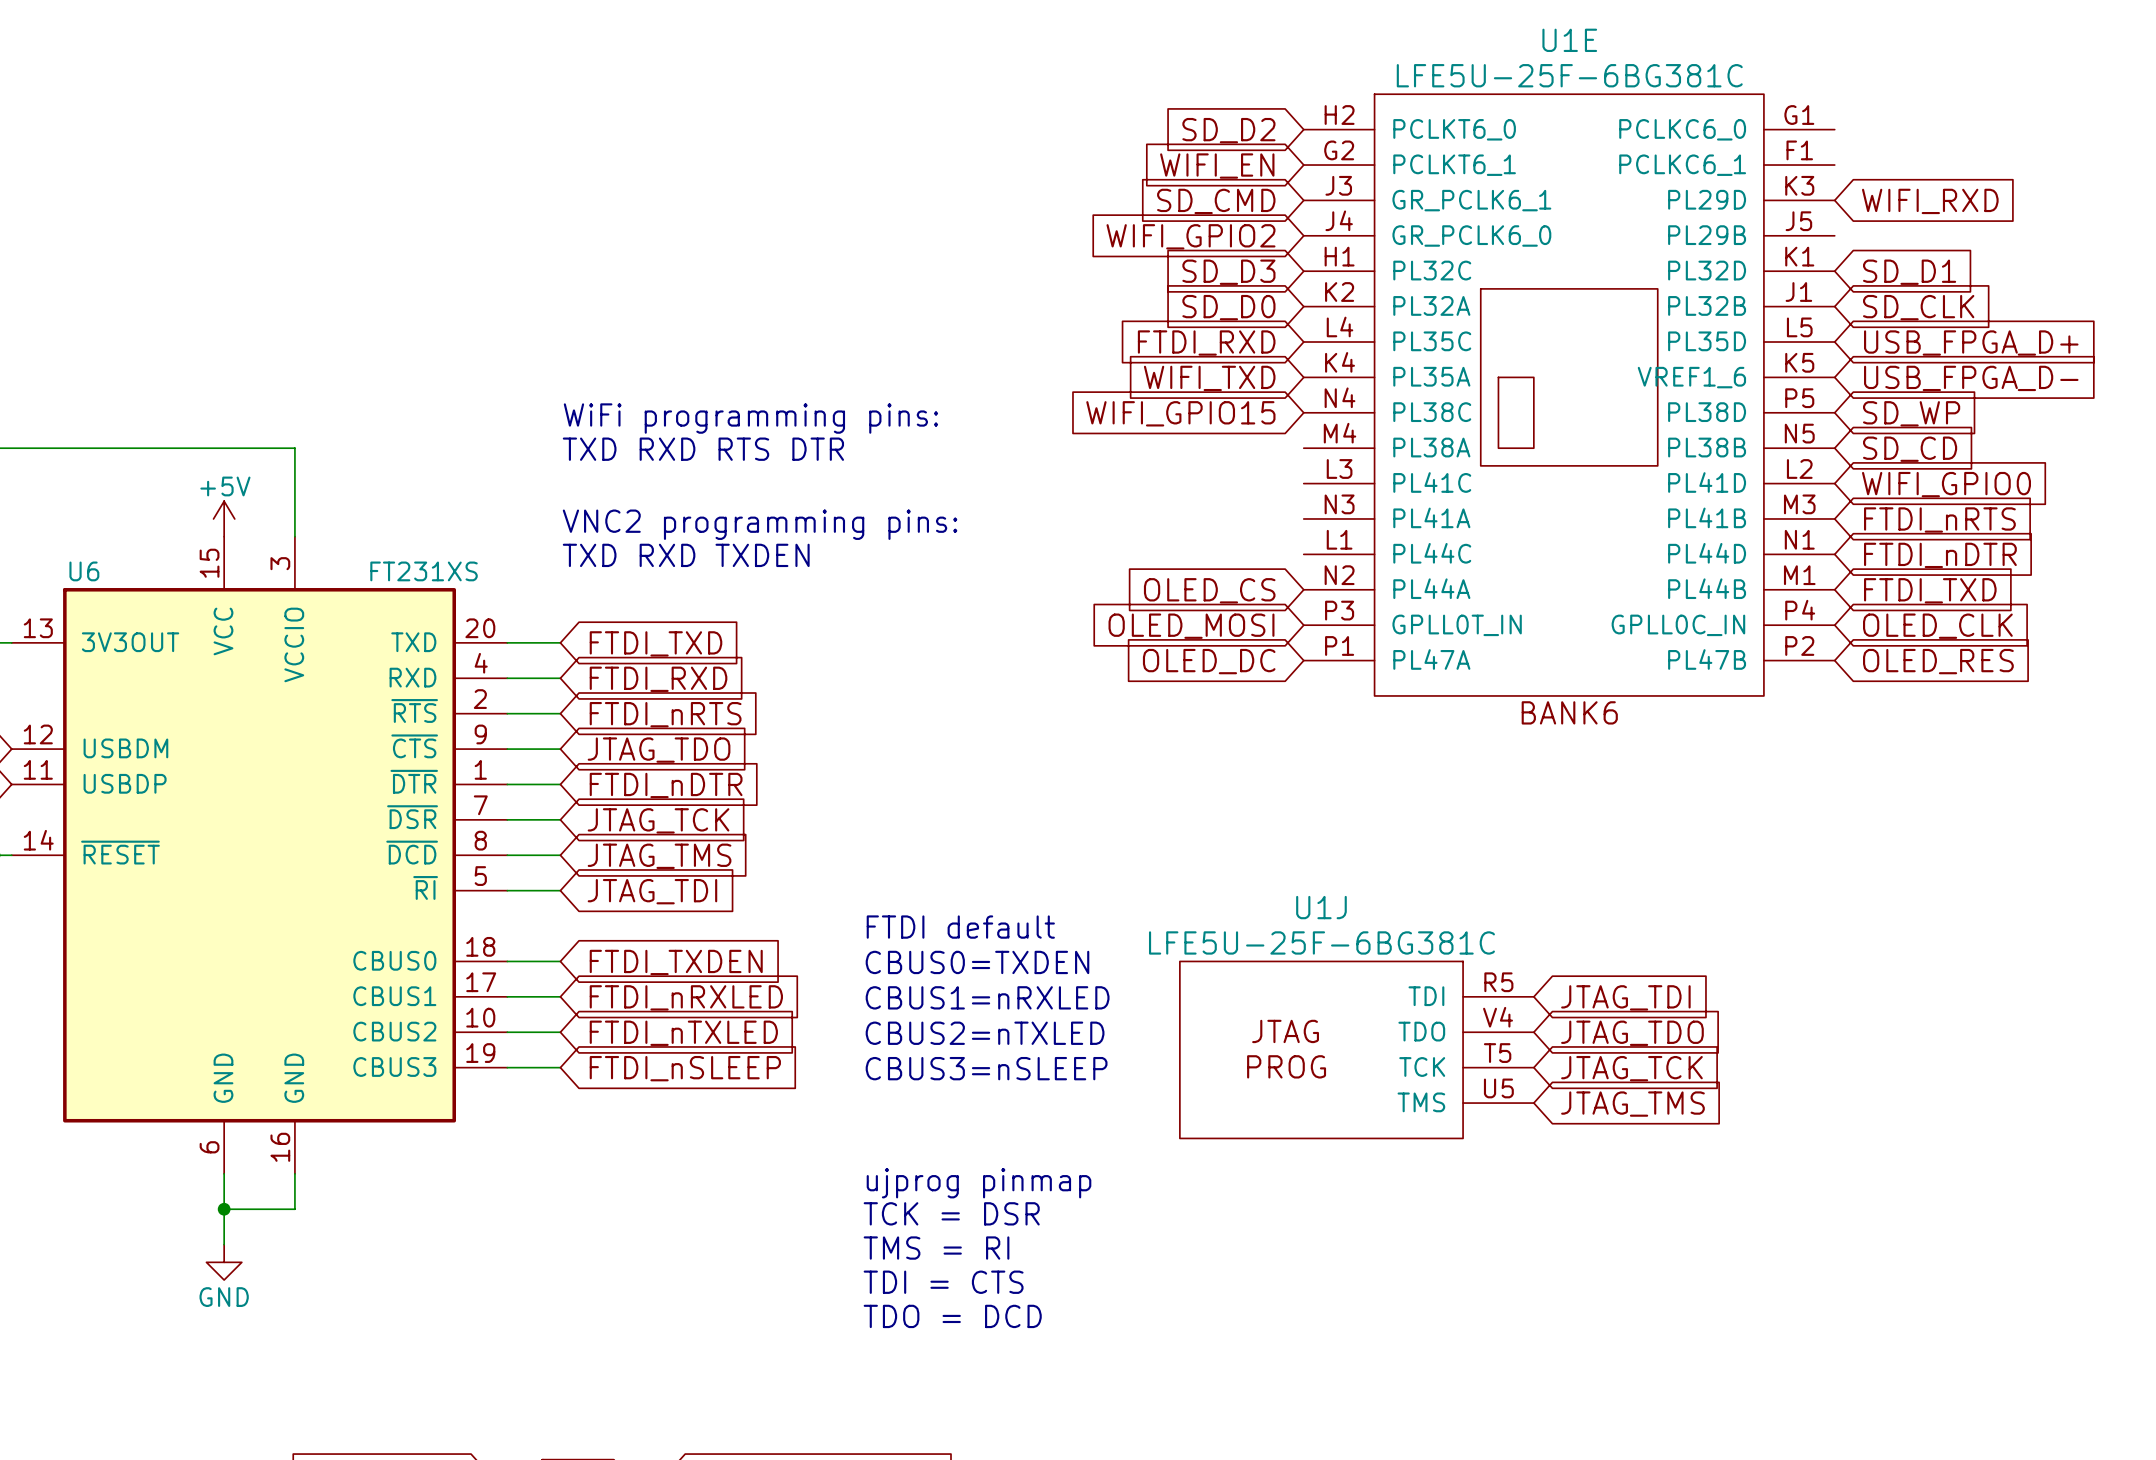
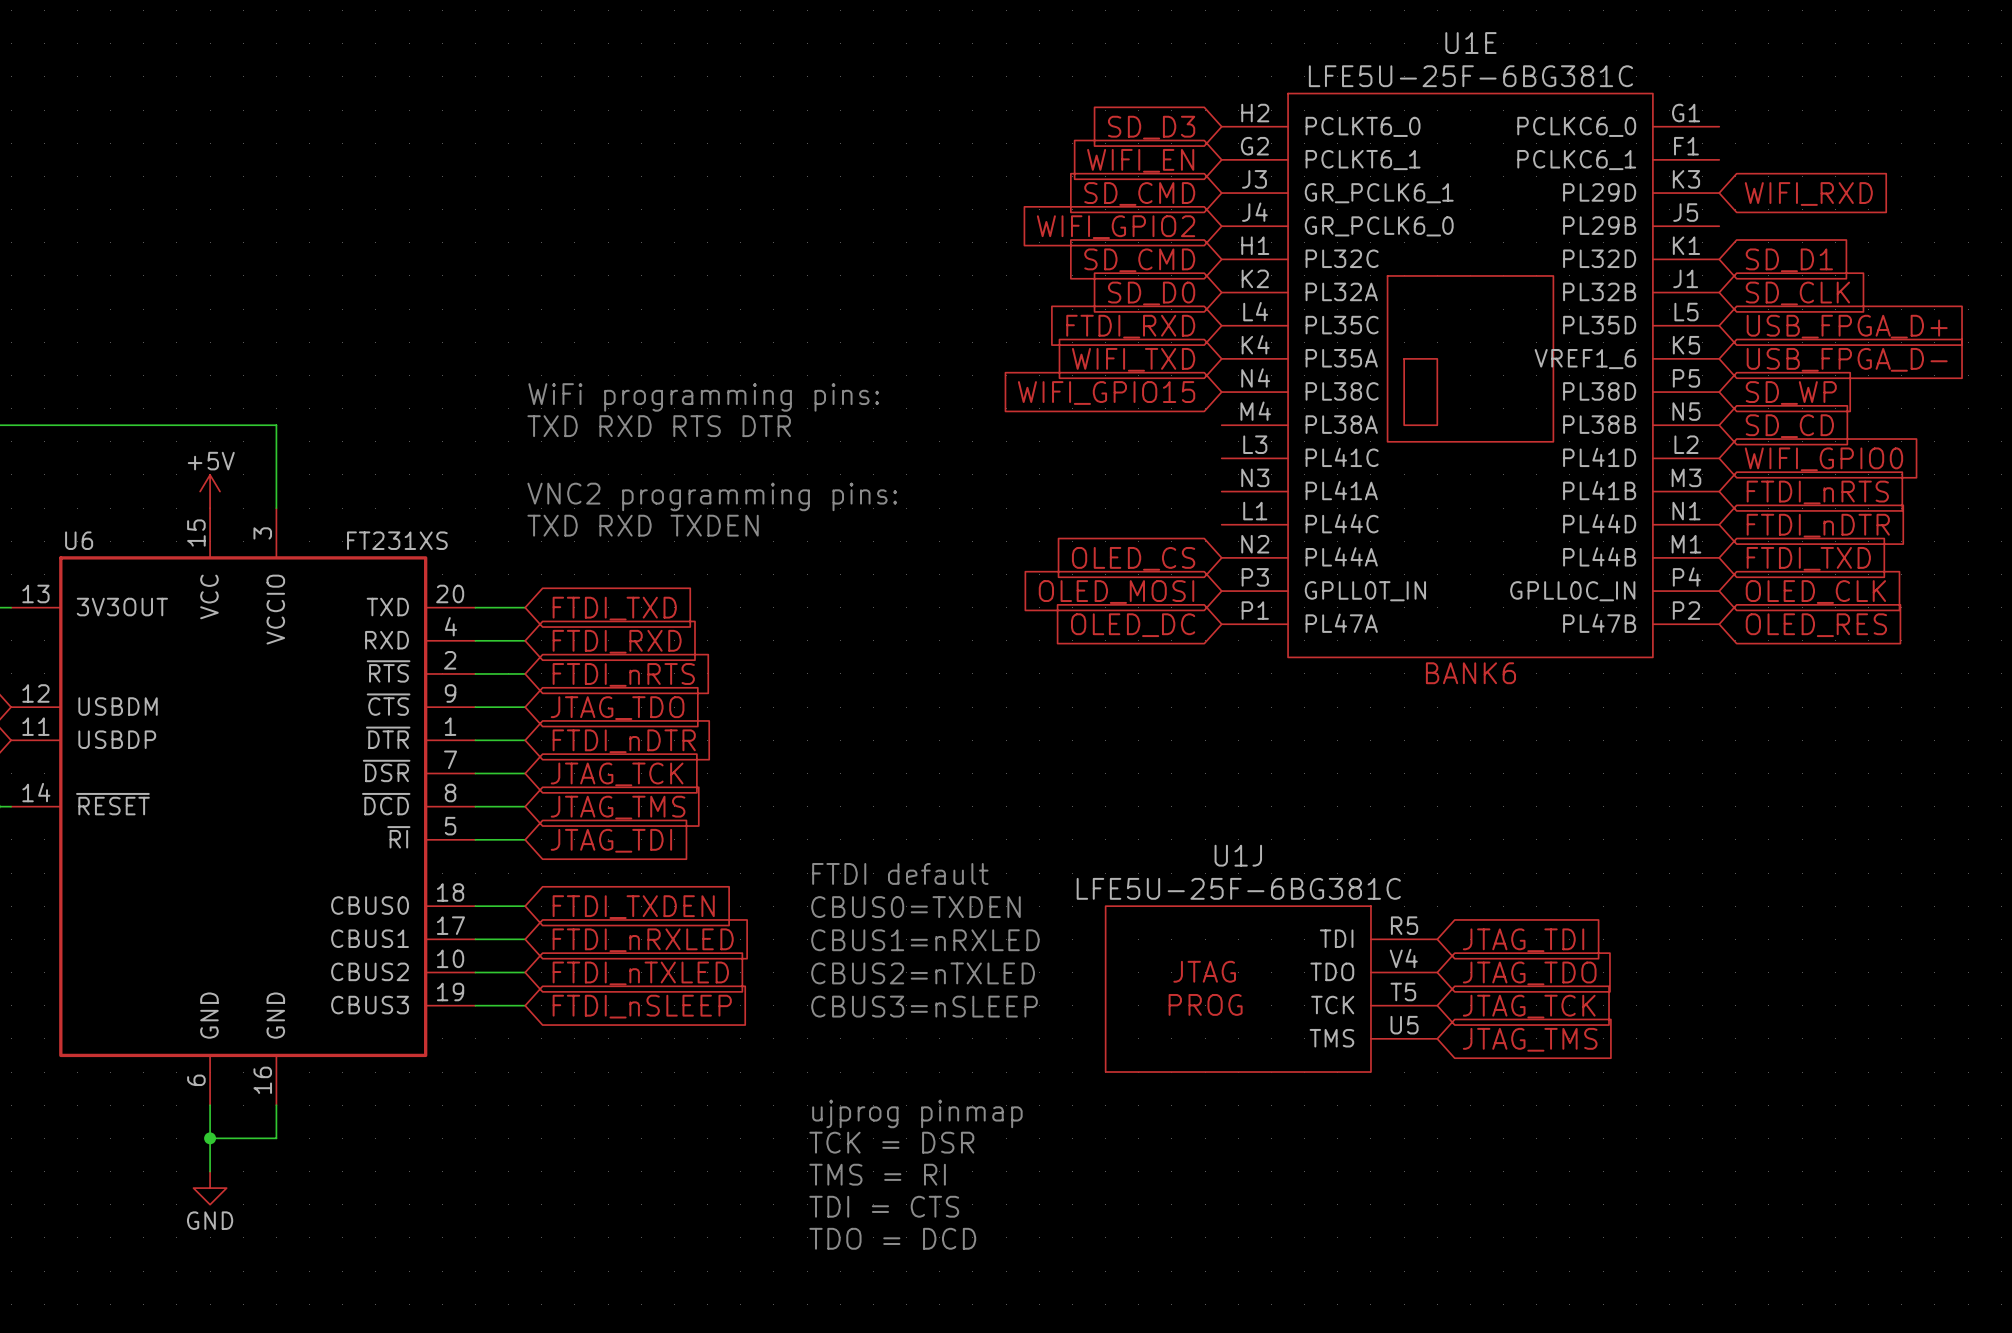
global label: SD_D2 (1228, 130) -> SD_D3 (1151, 127)
global label: SD_D3 (1228, 272) -> SD_CMD (1139, 260)

